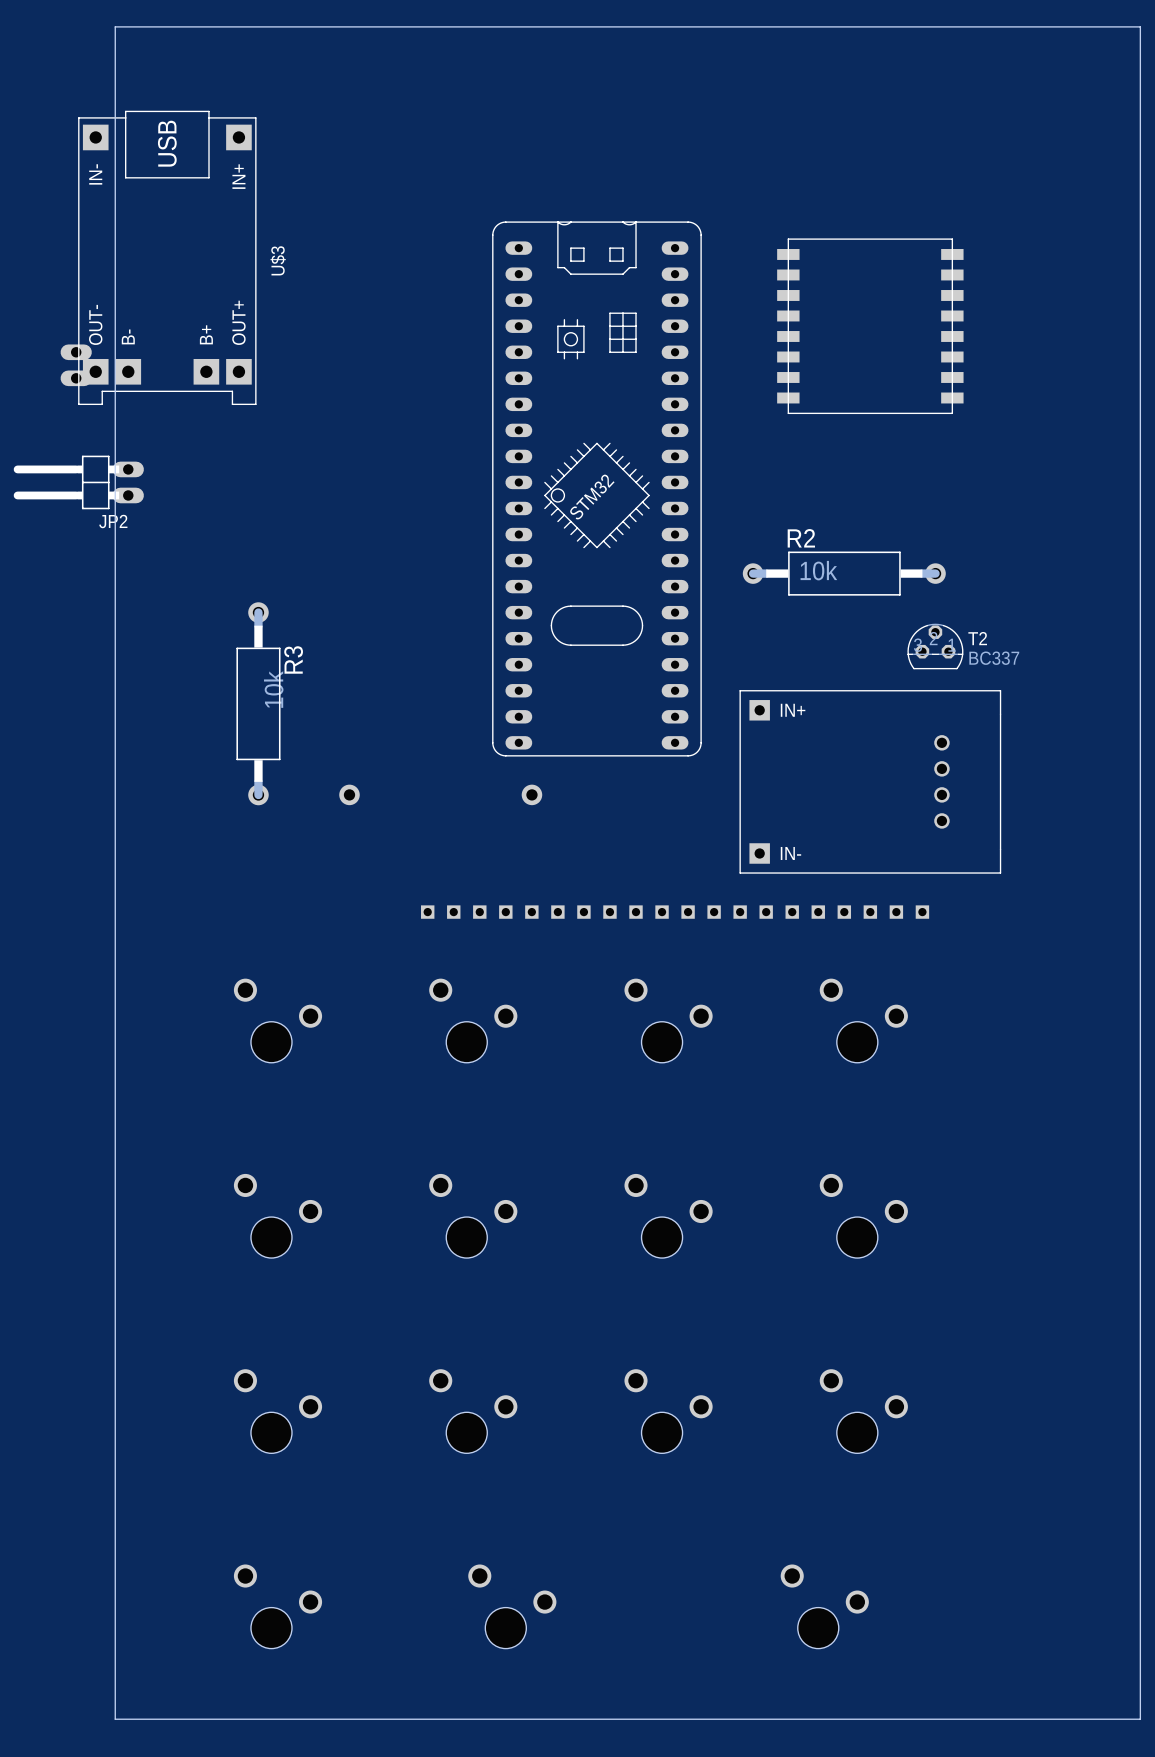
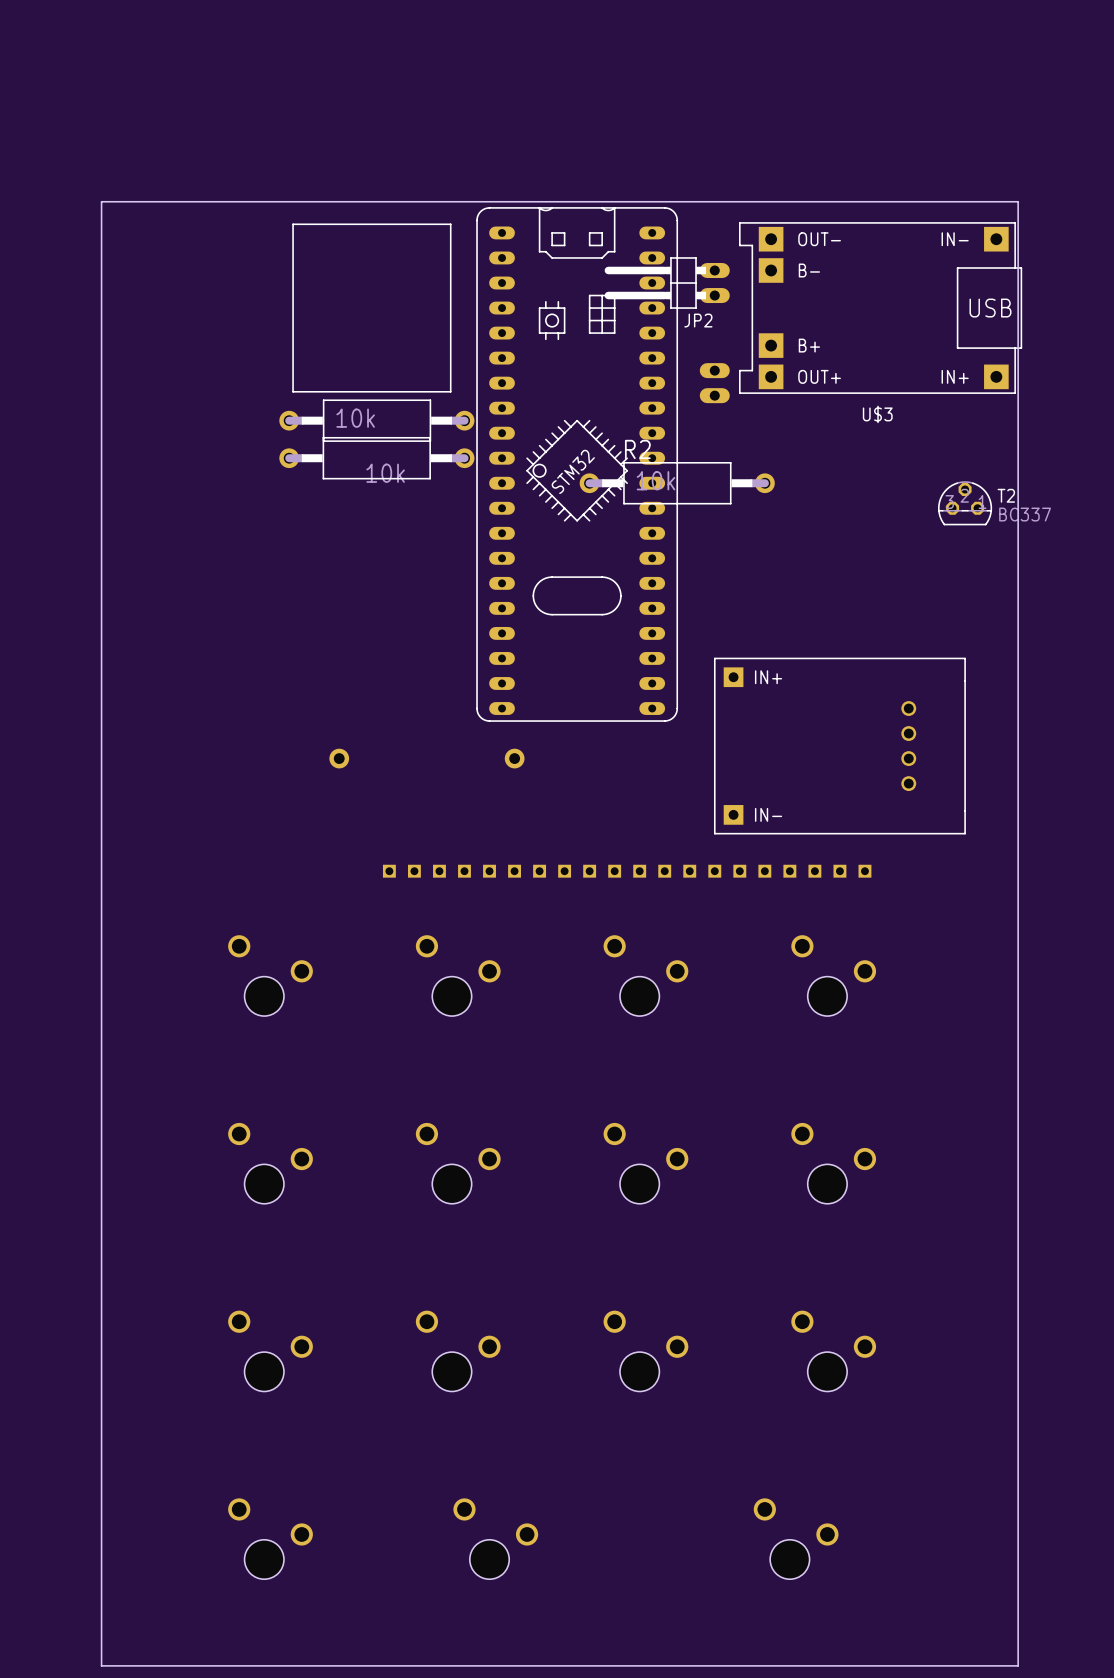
board edge: (115, 26) (1140, 26) (1140, 1719) (115, 1719) (115, 26) -> (101, 201) (101, 1665) (1018, 1665) (1018, 201) (101, 201)
U$3 rotation: 0° (167, 257) -> 90° clockwise (880, 308)
U$3 position: (167, 257) -> (880, 308)
part: none -> (371, 308)
part: (870, 326) -> none
part: (76, 365) -> none
part: none -> (714, 383)
part: none -> 10k (376, 420)
JP2 position: (78, 482) -> (667, 283)
part: none -> 10k (376, 458)
R2 position: (844, 573) -> (677, 483)
T2 position: (935, 646) -> (965, 503)
R3: 10k (258, 703) -> none
part position: (675, 912) -> (627, 871)

